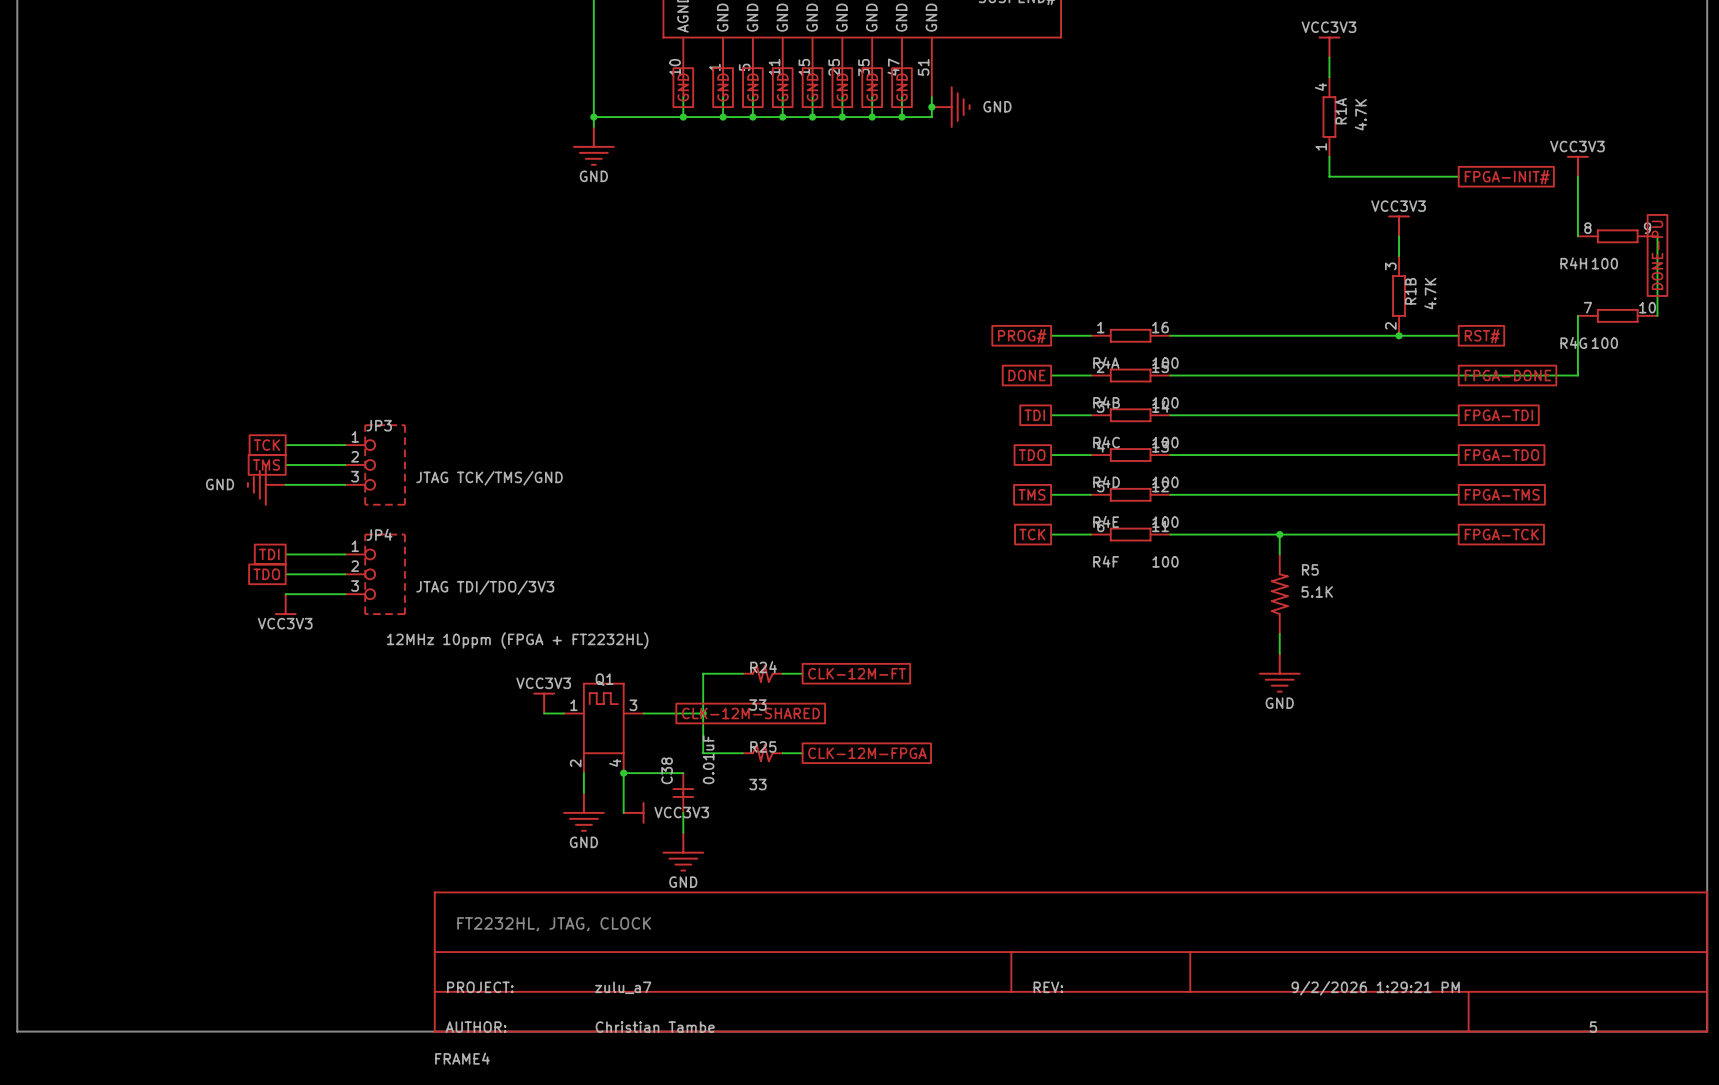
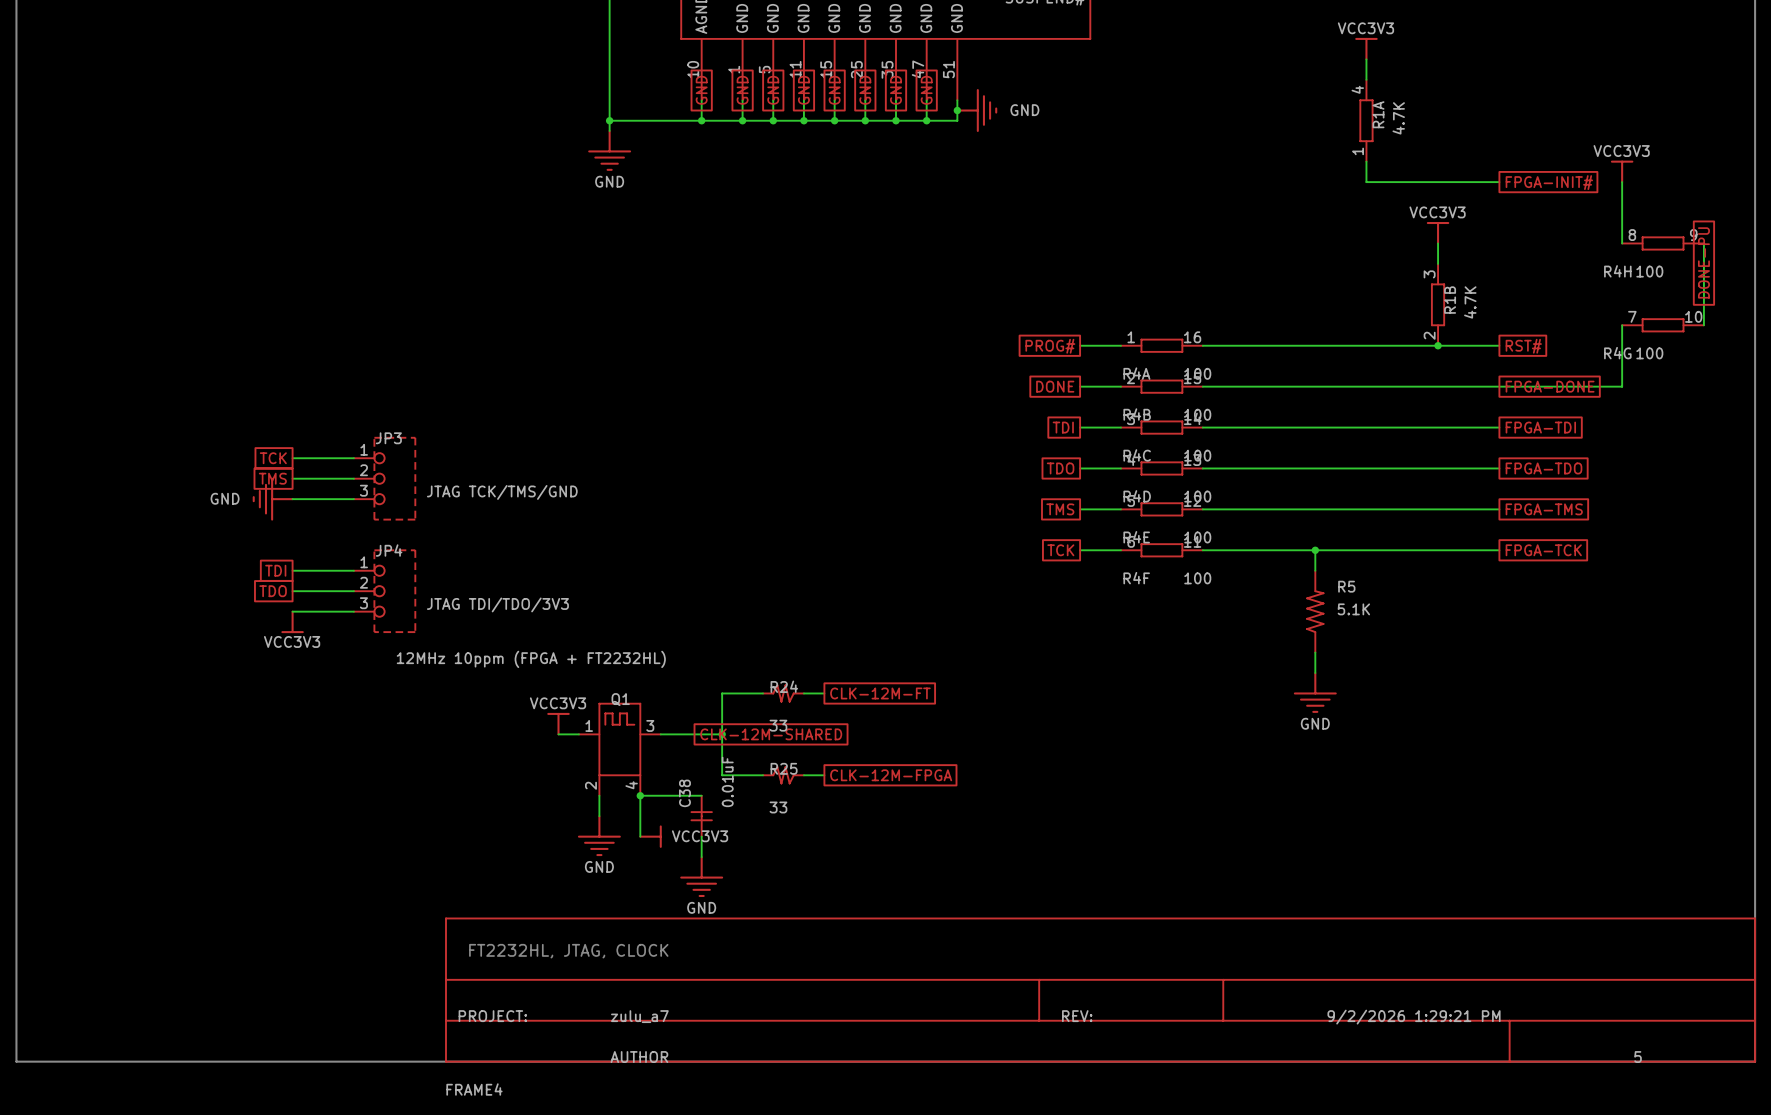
FRAME4 text: AUTHOR: (476, 1027) -> none
FRAME4 text: Christian Tambe (655, 1027) -> AUTHOR (639, 1057)

